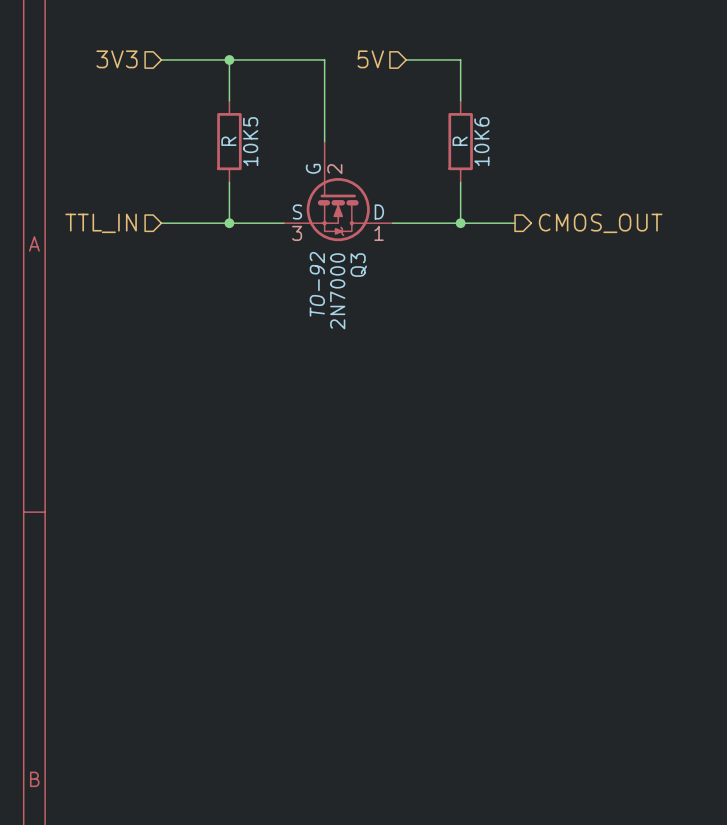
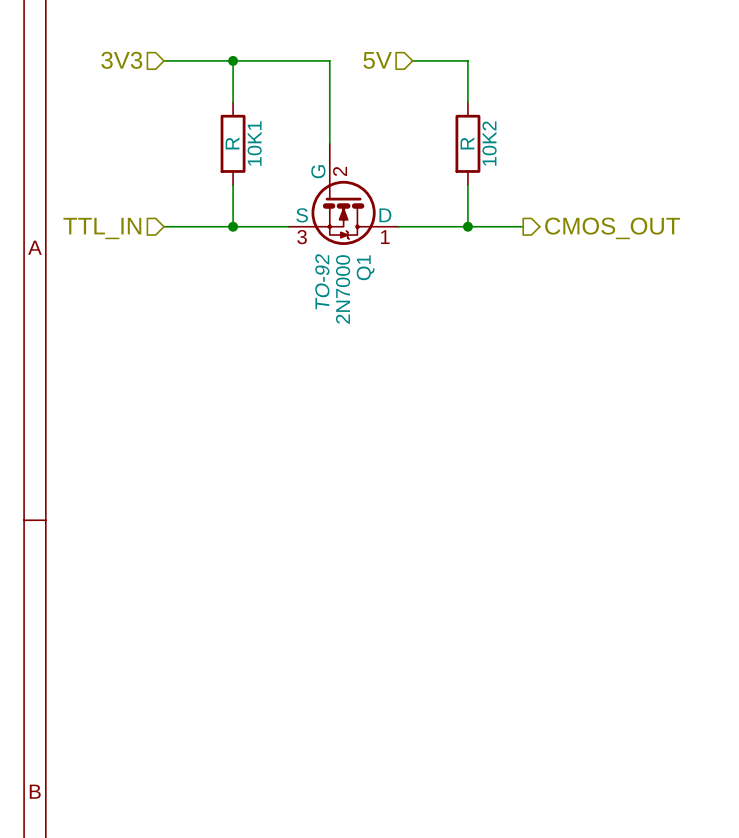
10K5 name: 10K5 (250, 141) -> 10K1 (254, 143)
10K6 name: 10K6 (481, 141) -> 10K2 (489, 143)
Q3 name: Q3 (358, 265) -> Q1 (365, 267)

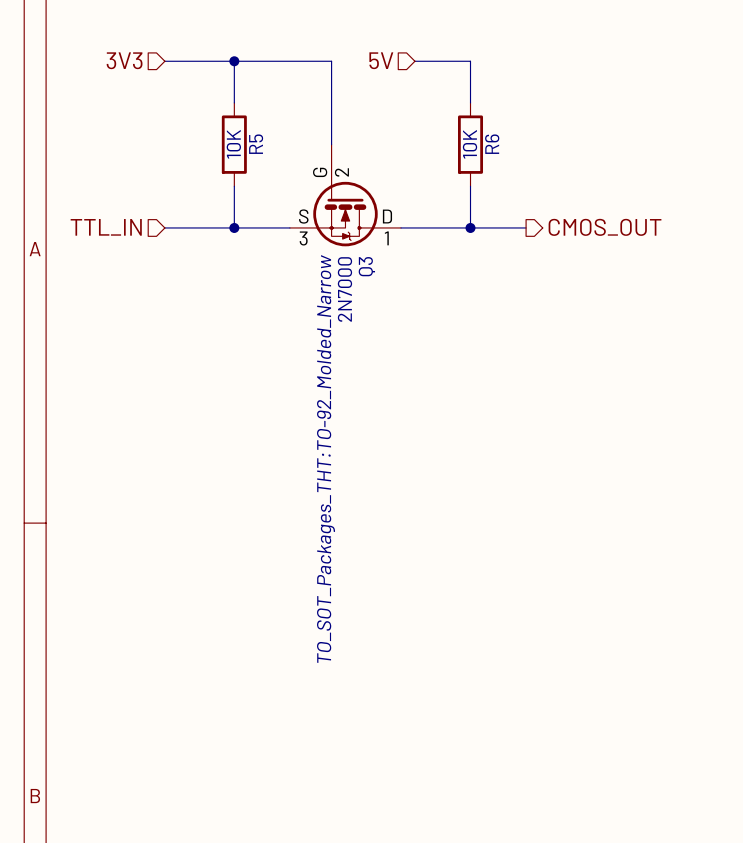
10K1 value: R (232, 143) -> 10K (233, 144)
10K1 name: 10K1 (254, 143) -> R5 (256, 144)
10K2 value: R (467, 143) -> 10K (469, 144)
10K2 name: 10K2 (489, 143) -> R6 (492, 144)
Q1 name: Q1 (365, 267) -> Q3 (366, 266)
Q1 text: TO-92 (322, 281) -> TO_SOT_Packages_THT:TO-92_Molded_Narrow (326, 459)

